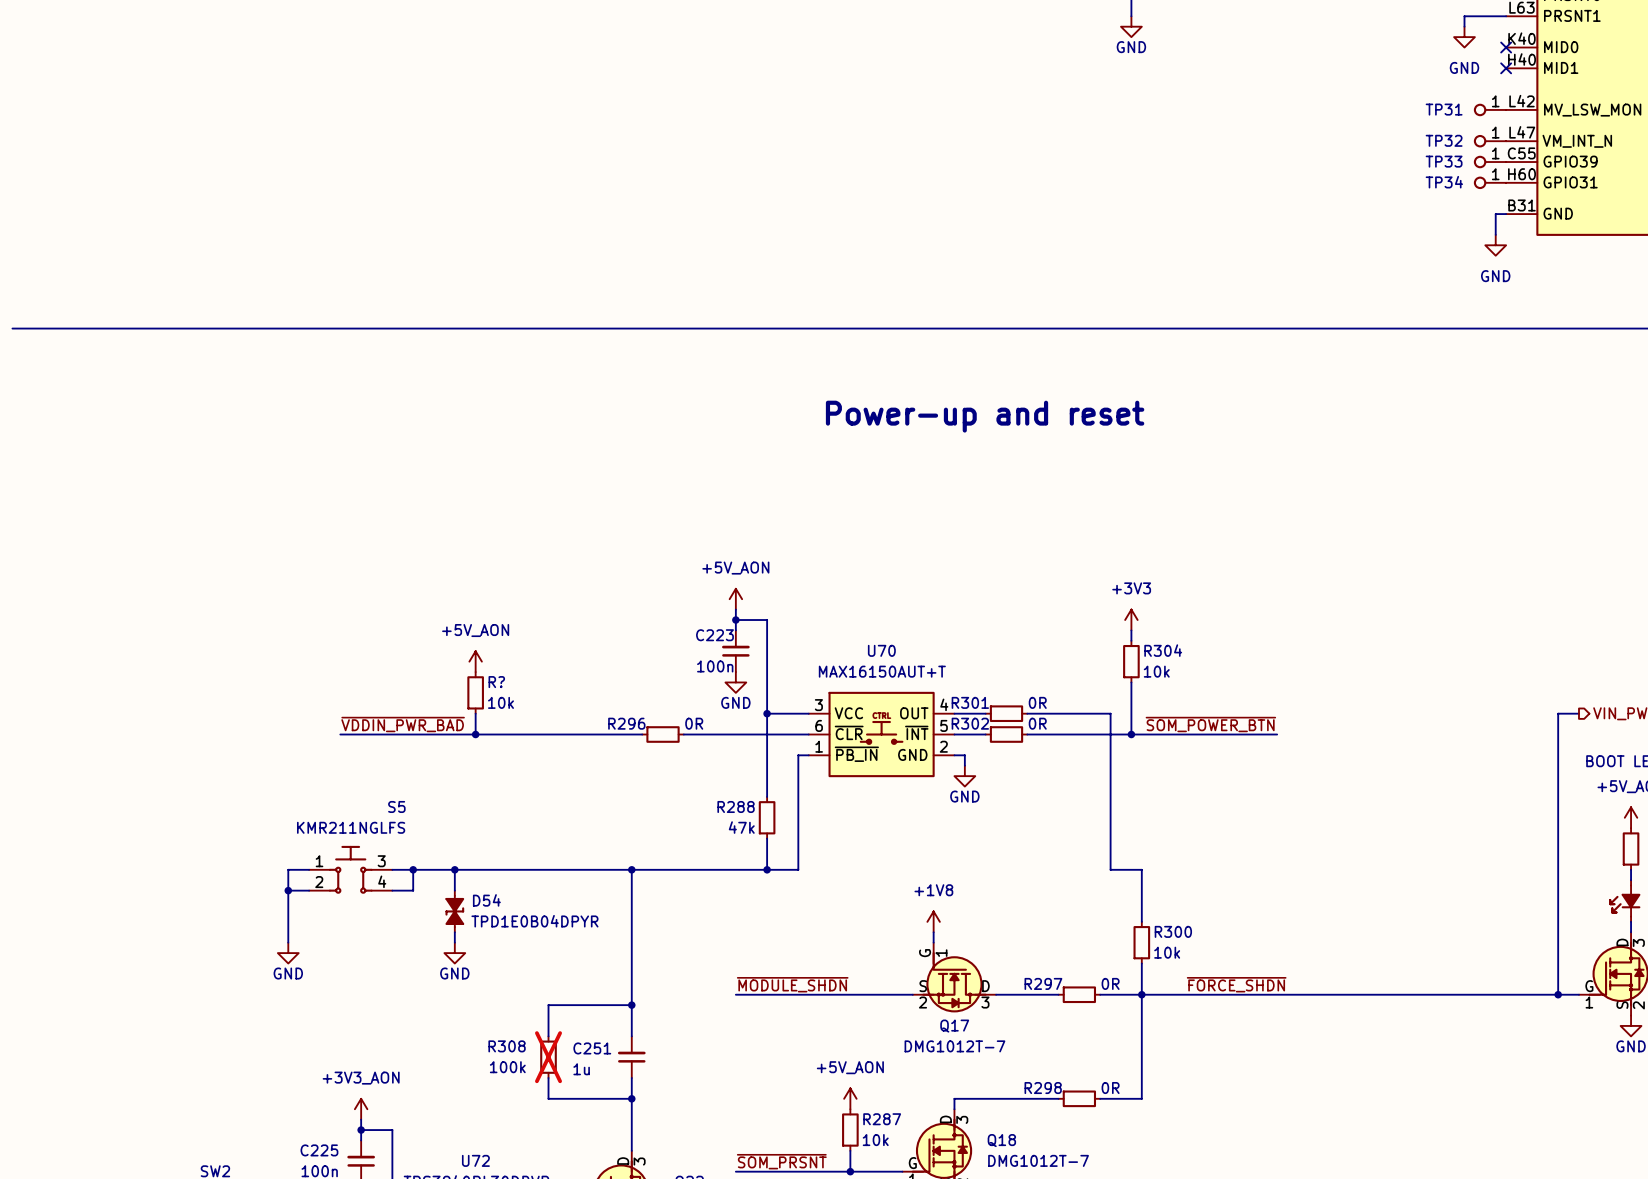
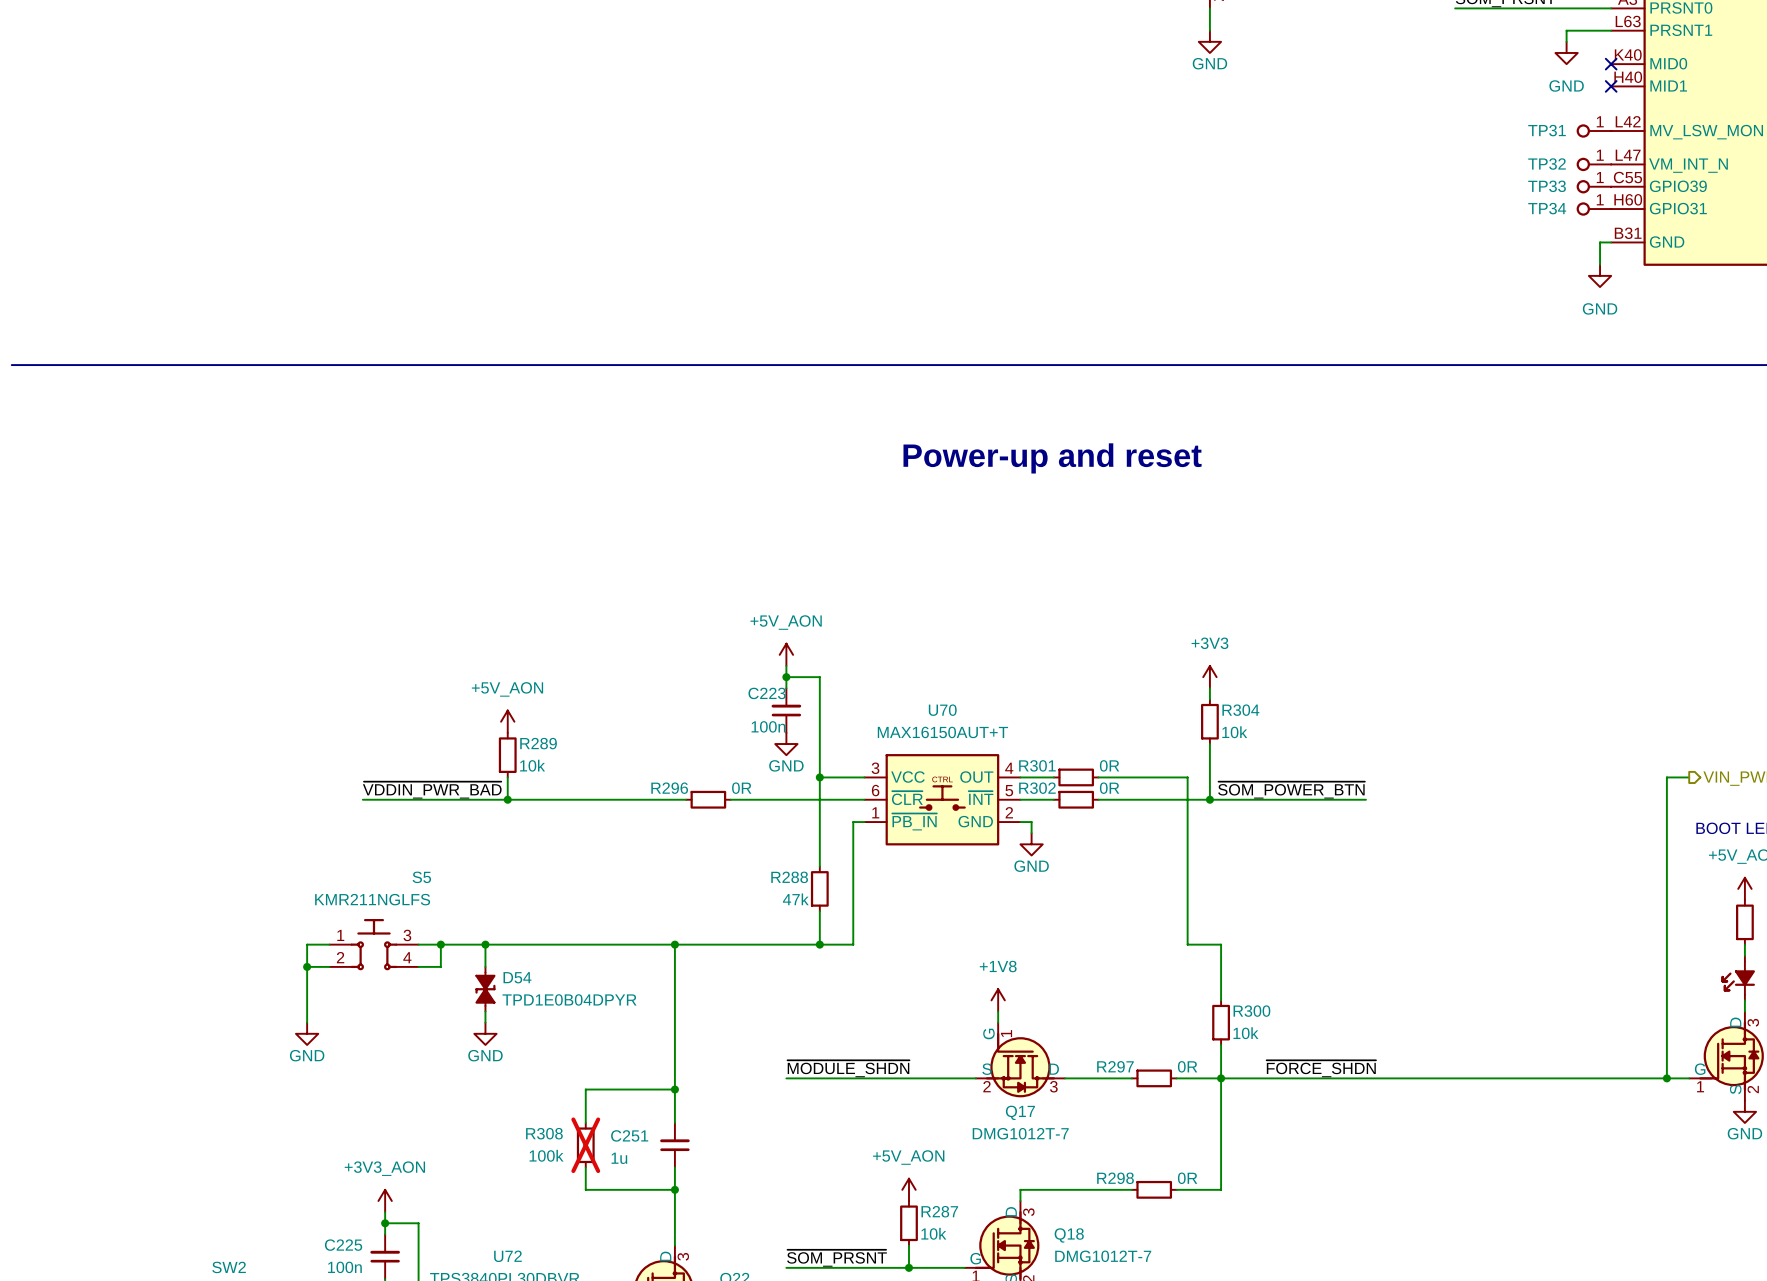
R? name: R? (496, 682) -> R289 (538, 743)

